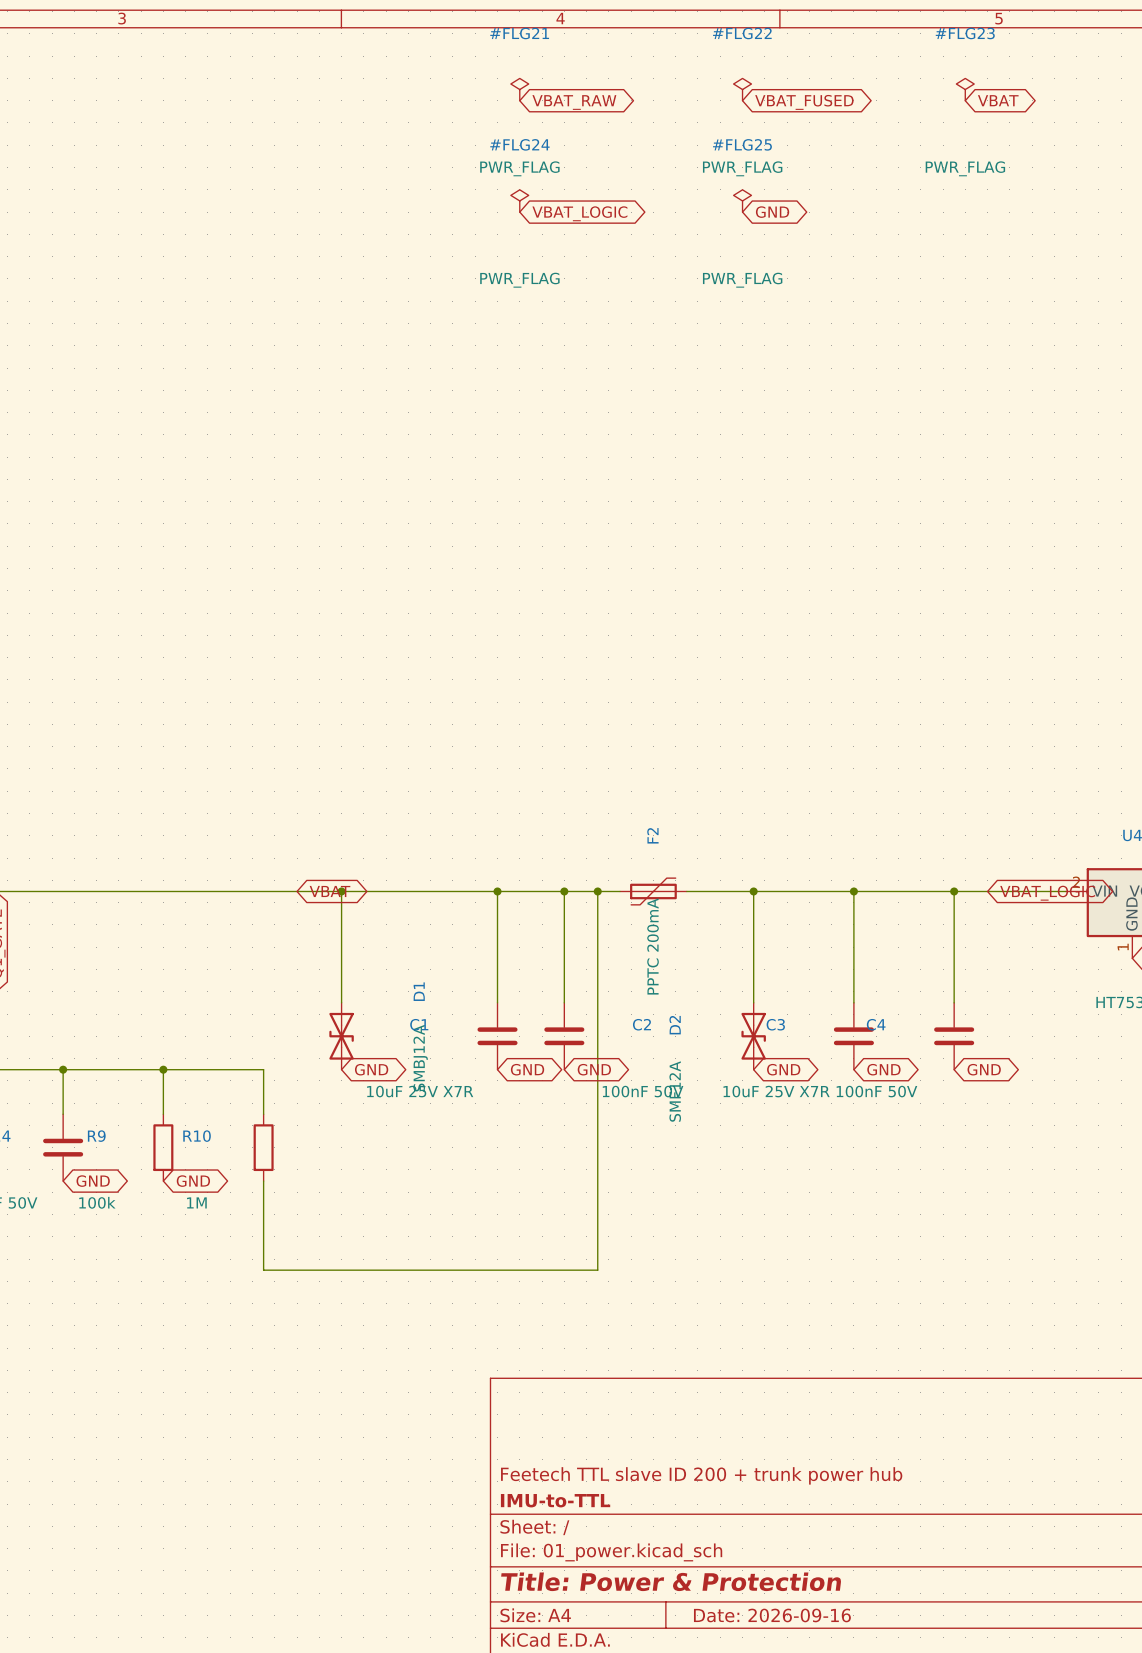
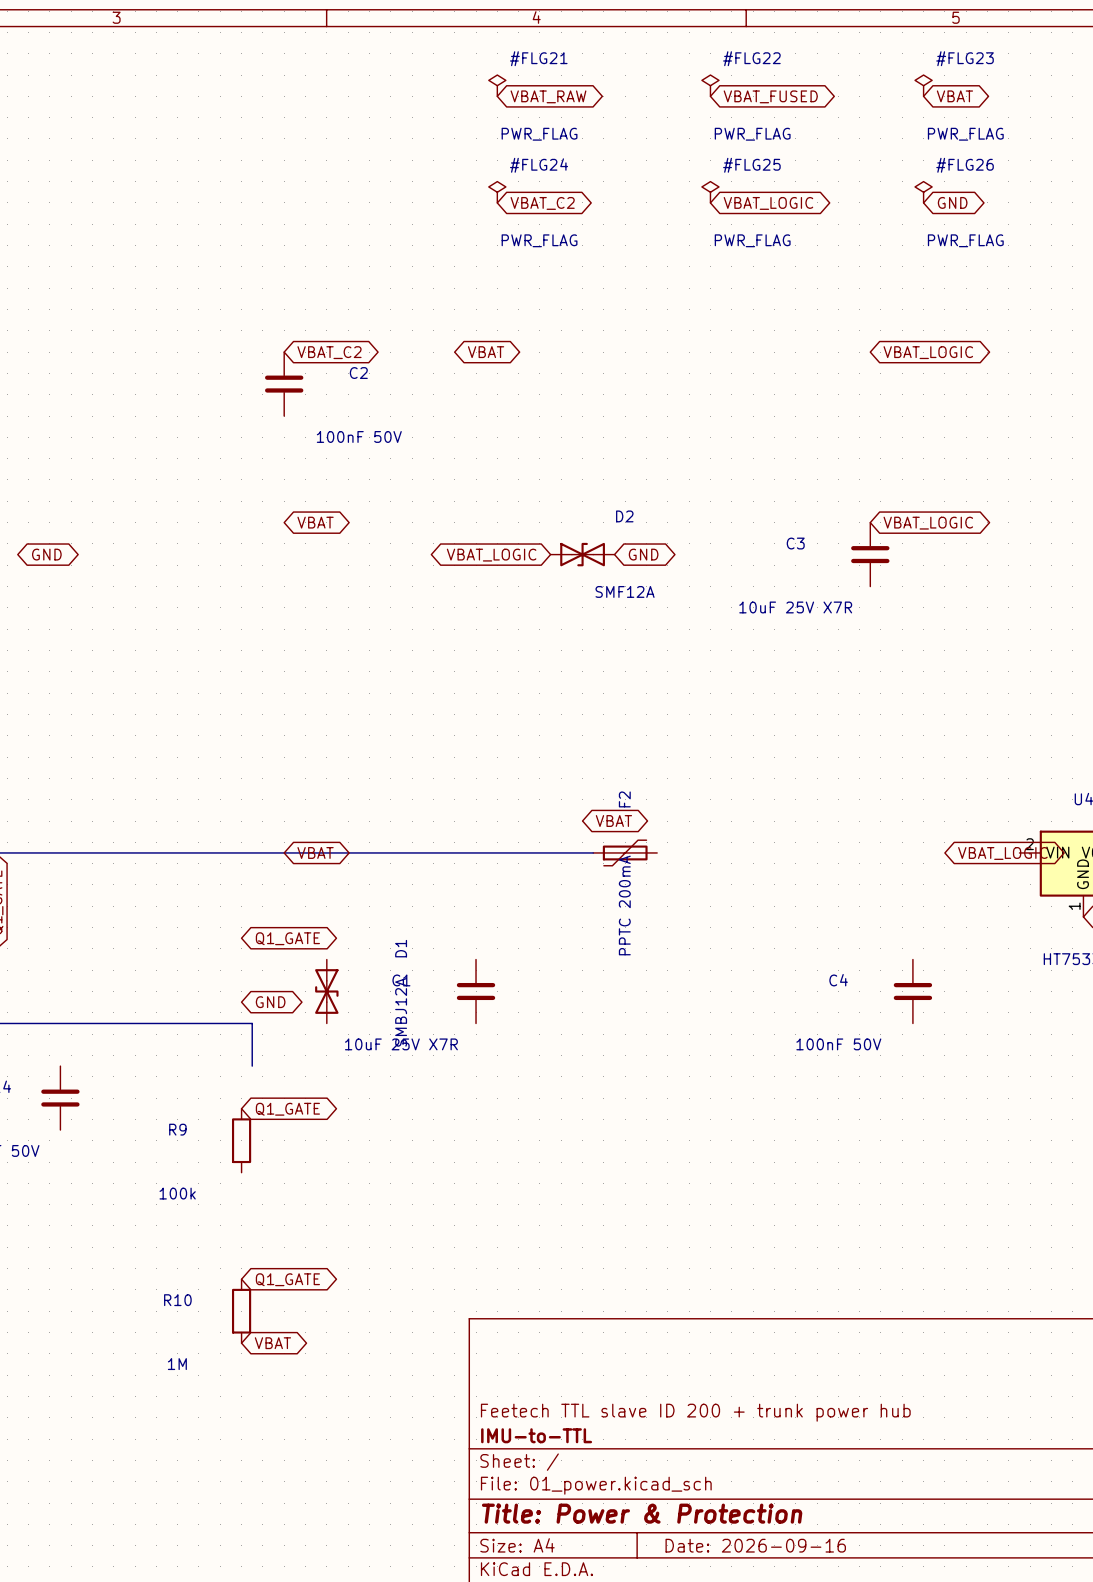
#FLG21 name position: #FLG21 (519, 33) -> #FLG21 (538, 58)
#FLG22 name position: #FLG22 (742, 33) -> #FLG22 (751, 58)
#FLG23 name position: #FLG23 (965, 33) -> #FLG23 (965, 58)
#FLG24 name position: #FLG24 (519, 144) -> #FLG24 (539, 165)
#FLG25 name position: #FLG25 (742, 144) -> #FLG25 (751, 165)
#FLG21 text position: PWR_FLAG (519, 168) -> PWR_FLAG (539, 134)
#FLG22 text position: PWR_FLAG (742, 168) -> PWR_FLAG (752, 134)
#FLG23 text position: PWR_FLAG (965, 168) -> PWR_FLAG (965, 134)
#FLG26: none -> PWR_FLAG (923, 192)
global label: GND (772, 212) -> VBAT_LOGIC (768, 203)
global label: none -> GND (952, 202)
global label: VBAT_LOGIC (579, 213) -> VBAT_C2 (542, 203)
#FLG24 text position: PWR_FLAG (519, 280) -> PWR_FLAG (539, 240)
#FLG25 text position: PWR_FLAG (742, 280) -> PWR_FLAG (752, 240)
global label: none -> VBAT (486, 352)
global label: none -> VBAT_C2 (329, 352)
global label: none -> VBAT_LOGIC (928, 352)
global label: none -> VBAT (315, 522)
global label: none -> VBAT_LOGIC (928, 523)
global label: none -> GND (46, 554)
global label: none -> GND (643, 554)
global label: none -> VBAT_LOGIC (491, 555)
global label: none -> VBAT (613, 821)
wire: (341, 891) (341, 1002) -> none
junction: (341, 891) -> none
wire: (497, 891) (497, 1002) -> none
junction: (497, 891) -> none
wire: (564, 891) (564, 1002) -> none
junction: (564, 891) -> none
wire: (597, 891) (597, 1270) (263, 1270) (263, 1181) -> none
junction: (597, 891) -> none
wire: (686, 891) (1065, 891) -> none
wire: (753, 891) (753, 1002) -> none
junction: (753, 891) -> none
wire: (853, 891) (853, 1002) -> none
junction: (853, 891) -> none
wire: (954, 891) (954, 1002) -> none
junction: (954, 891) -> none
global label: none -> Q1_GATE (287, 938)
D2 name position: D2 (675, 1025) -> D2 (624, 516)
C2 position: (564, 1036) -> (284, 384)
D2 rotation: 0° (753, 1036) -> 90° clockwise (582, 554)
D2 position: (753, 1036) -> (582, 554)
C3 position: (853, 1036) -> (870, 554)
global label: none -> GND (270, 1002)
wire: (63, 1069) (63, 1114) -> none
junction: (63, 1069) -> none
wire: (163, 1069) (163, 1114) -> none
junction: (163, 1069) -> none
global label: GND (371, 1069) -> none
global label: GND (527, 1069) -> none
global label: GND (594, 1069) -> none
global label: GND (783, 1069) -> none
global label: GND (883, 1069) -> none
global label: GND (984, 1069) -> none
D2 value position: SMF12A (675, 1091) -> SMF12A (625, 591)
R9 position: (163, 1147) -> (241, 1140)
R10 position: (263, 1147) -> (241, 1311)
global label: none -> Q1_GATE (287, 1109)
global label: GND (93, 1181) -> none
global label: GND (193, 1181) -> none
global label: none -> Q1_GATE (287, 1279)
global label: none -> VBAT (272, 1343)

